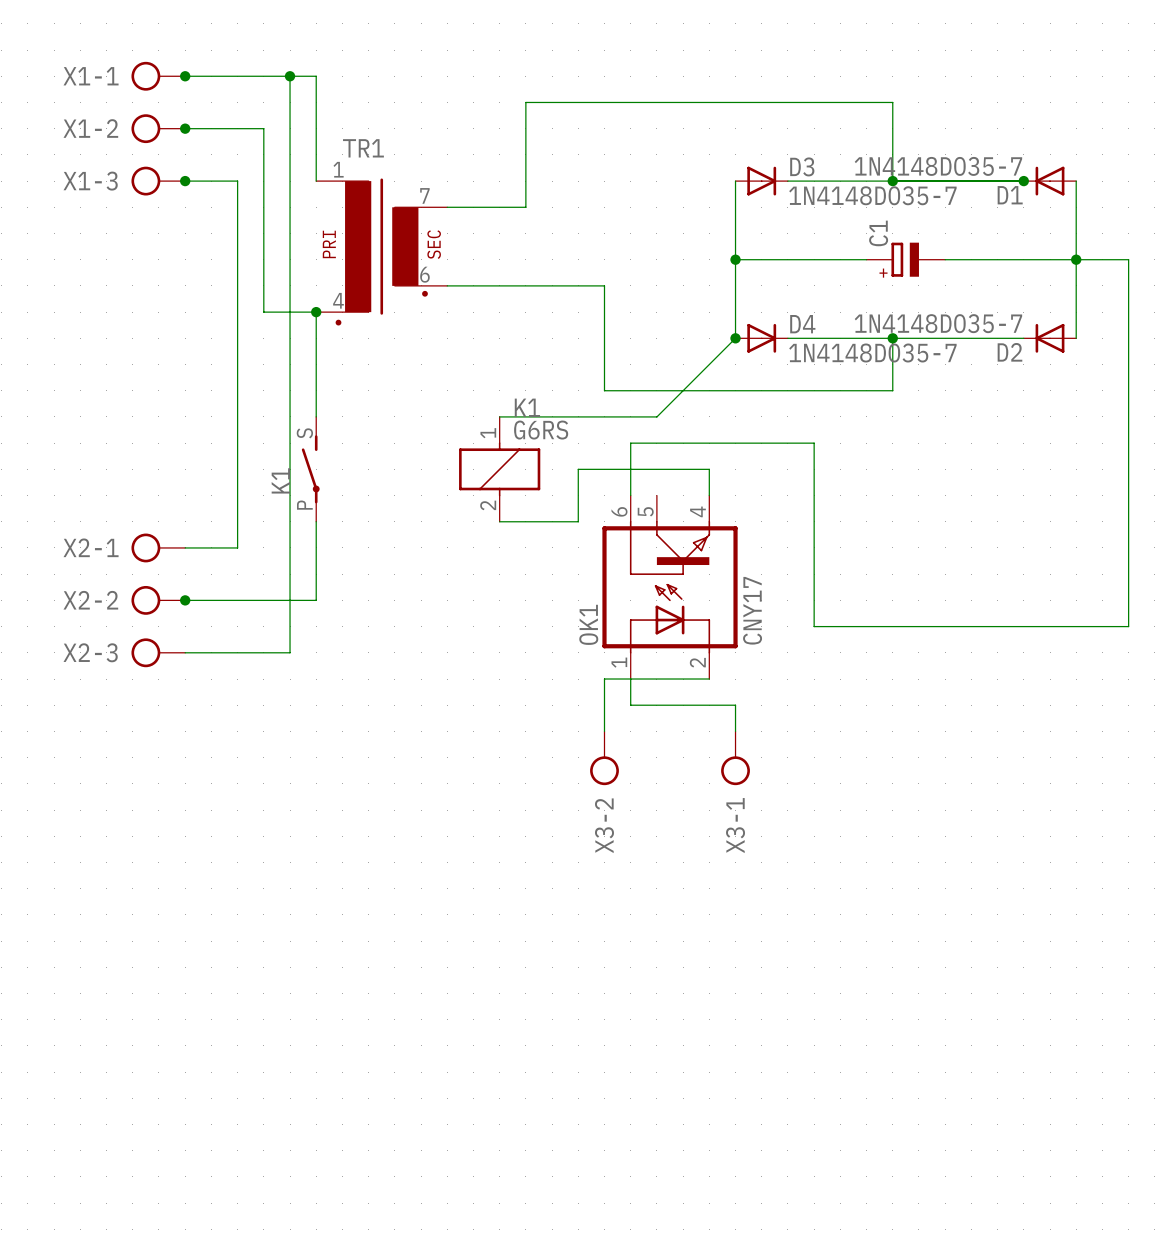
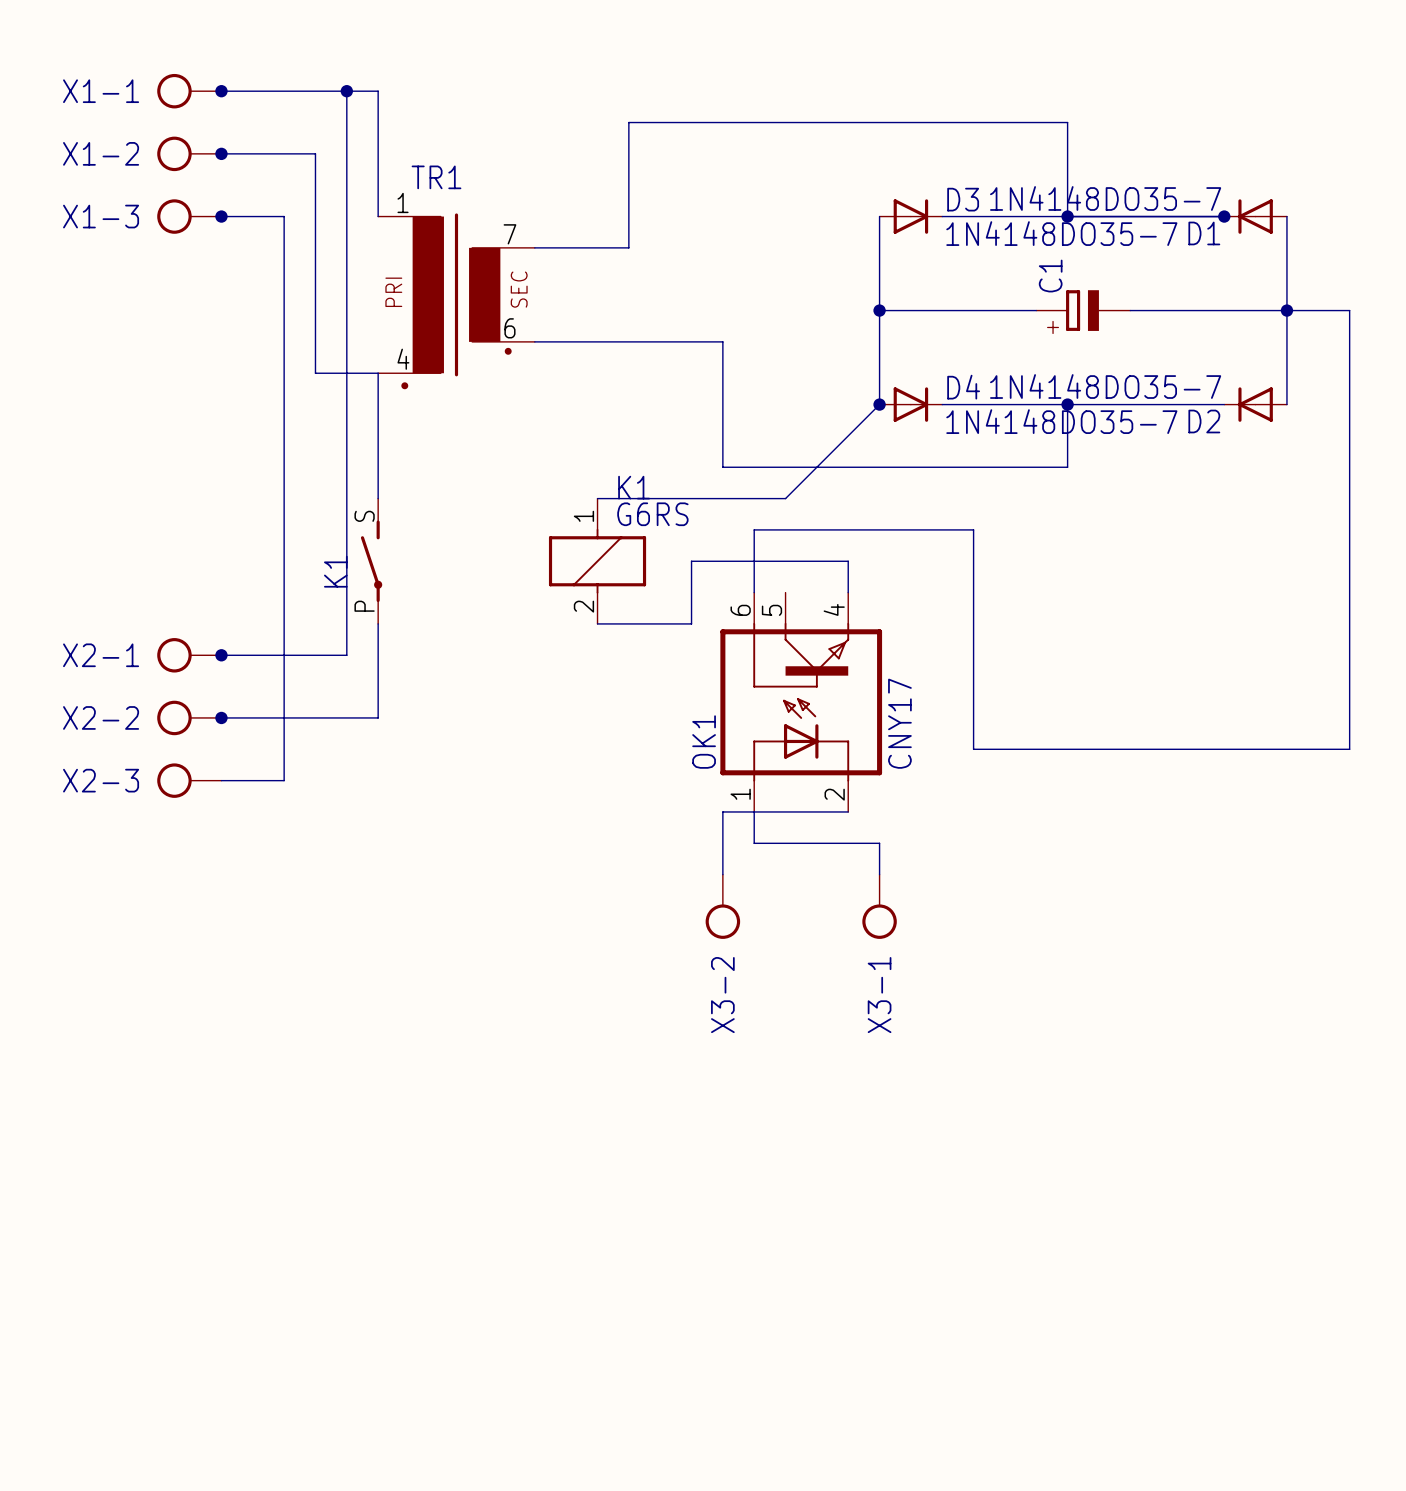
junction: (316, 312) -> none
junction: none -> (221, 655)
wire: (290, 547) (290, 652) (237, 652) -> (346, 655) (284, 655) (284, 780)

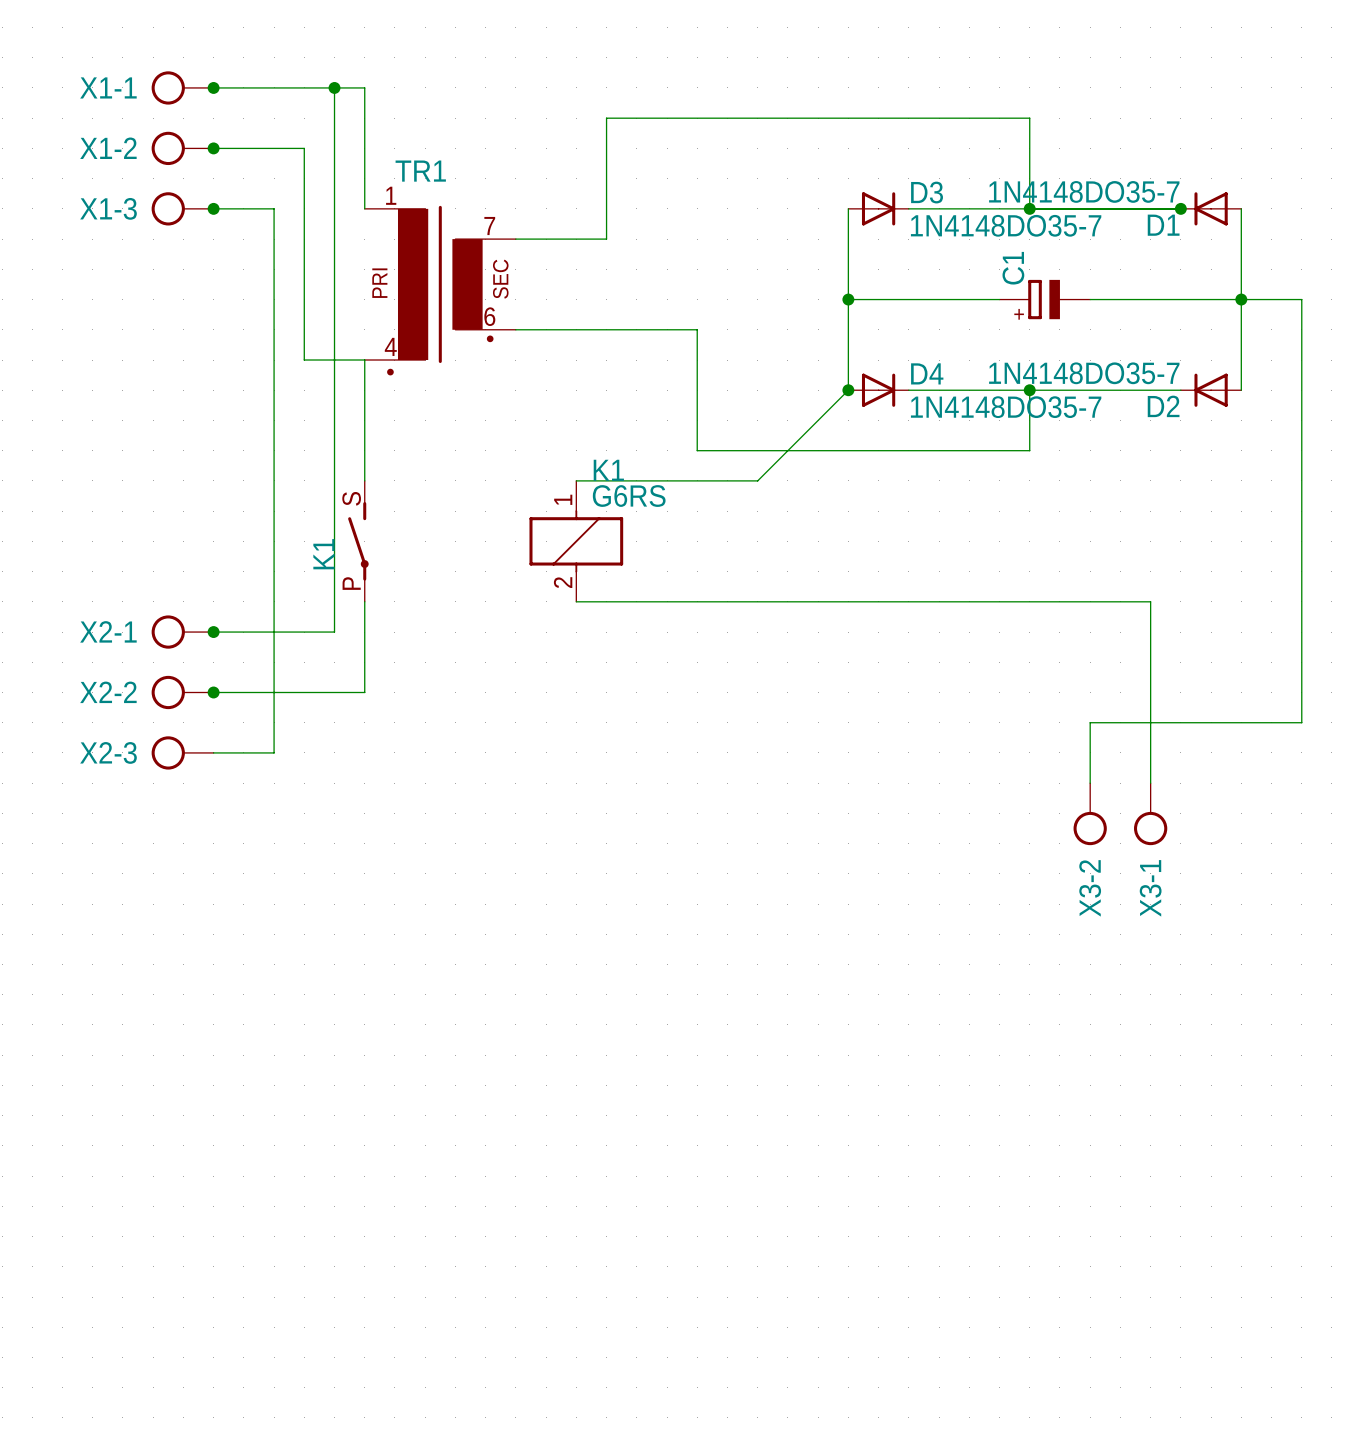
wire: (754, 592) (754, 529) (973, 529) (973, 749) (1130, 749) -> (1090, 783) (1090, 722)
wire: (848, 592) (848, 561) (691, 561) (691, 623) -> (1150, 783) (1150, 601) (667, 601)
OK1: CNY17 (801, 702) -> none
wire: (754, 811) (754, 843) (879, 843) (879, 874) -> none
wire: (848, 811) (722, 811) (722, 874) -> none
X3-2 position: (722, 906) -> (1090, 814)
X3-1 position: (879, 906) -> (1150, 814)

